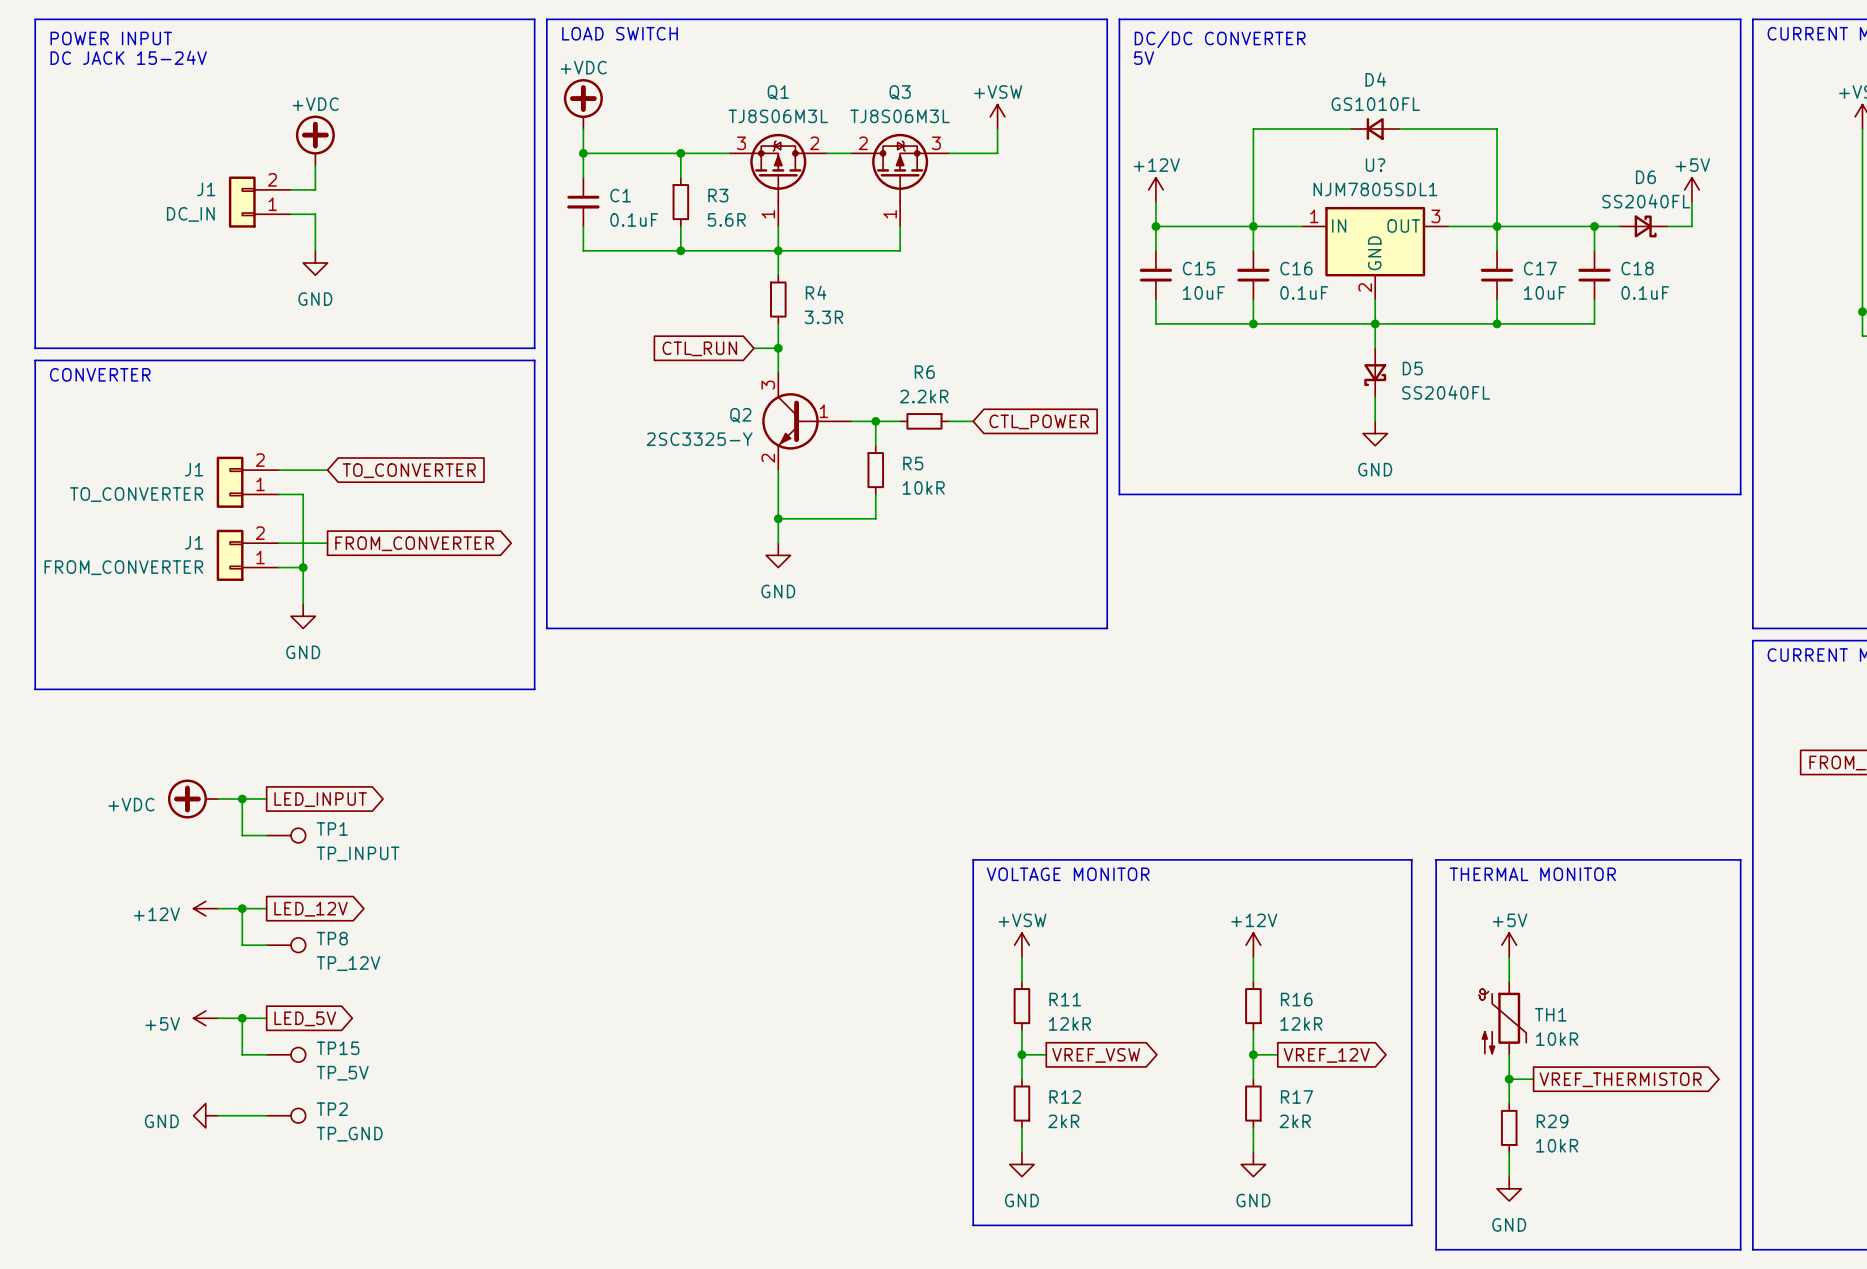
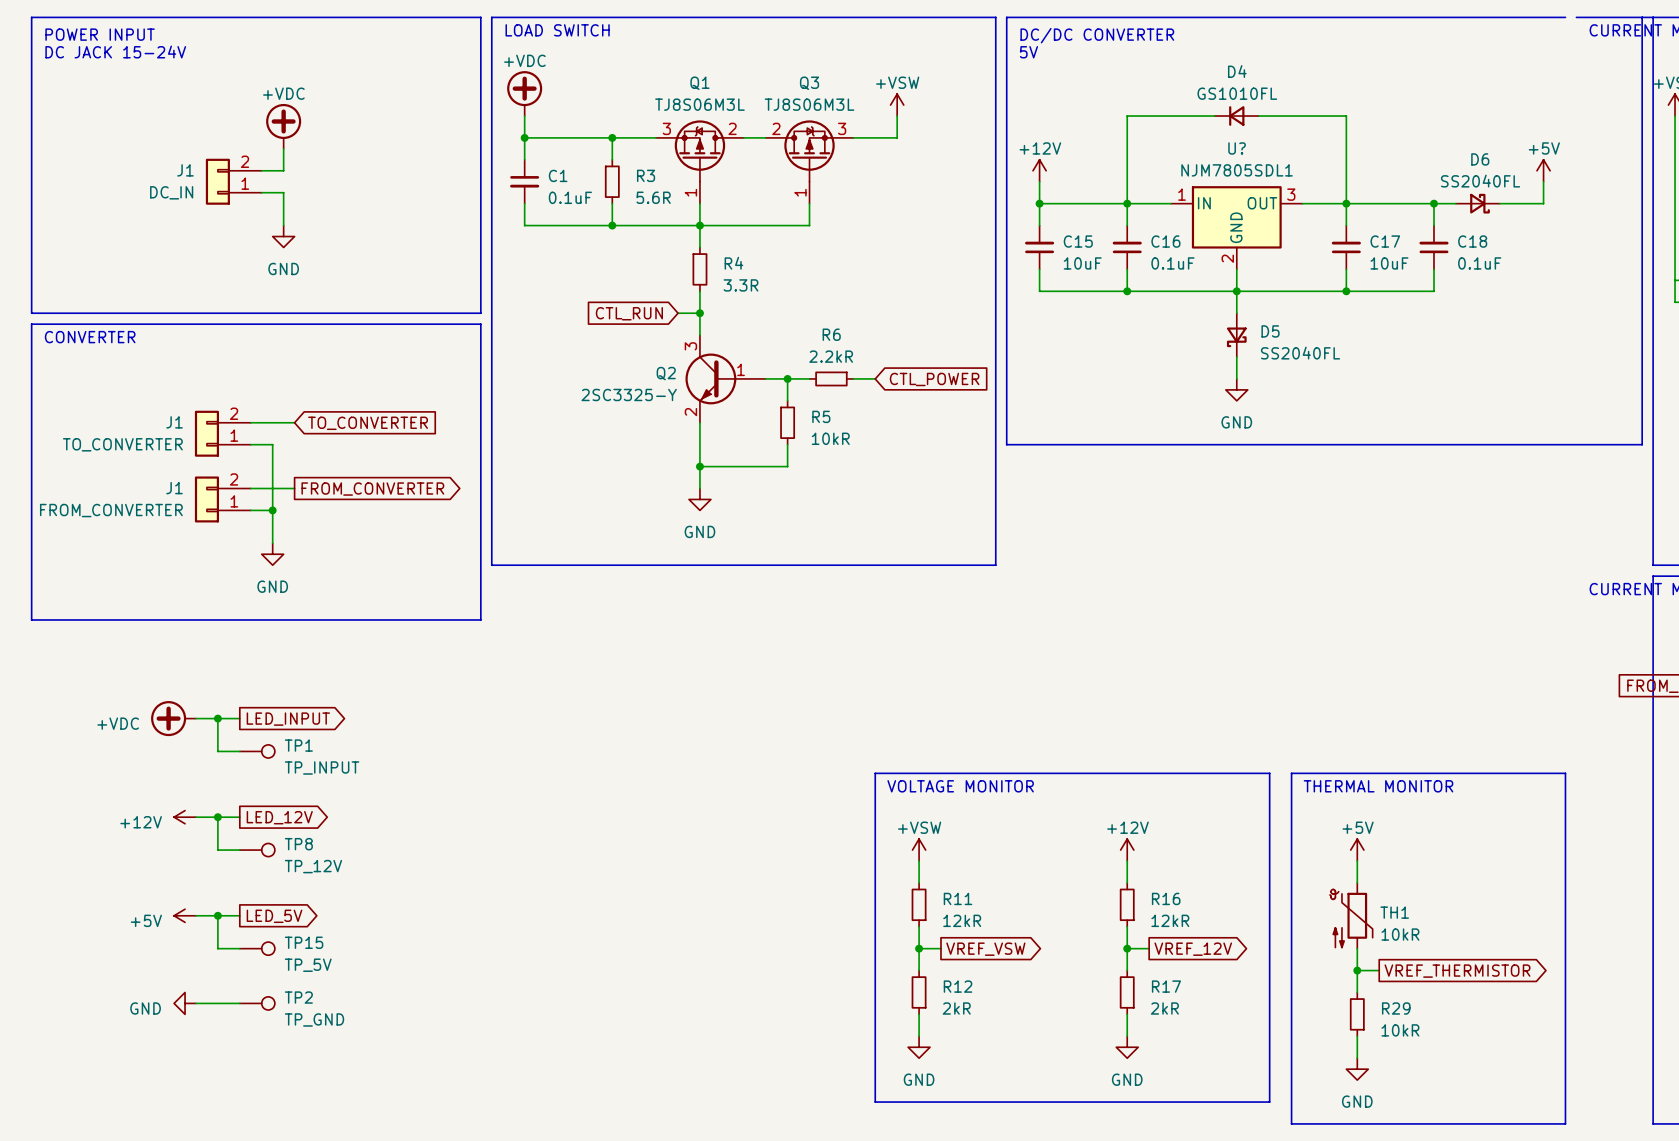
line: (1740, 19) (1740, 494) -> (1642, 17) (1642, 444) (1565, 444)
line: (1752, 19) (1752, 628) (1838, 628) -> (1653, 17) (1653, 565)
power symbol position: +5V (1691, 189) -> +5V (1543, 170)
wire: (1691, 202) (1691, 226) -> (1543, 181) (1543, 203) (1521, 203)
junction: (1862, 311) -> none
line: (1838, 640) (1752, 640) (1752, 1249) (1838, 1249) -> (1653, 576) (1653, 1123)

